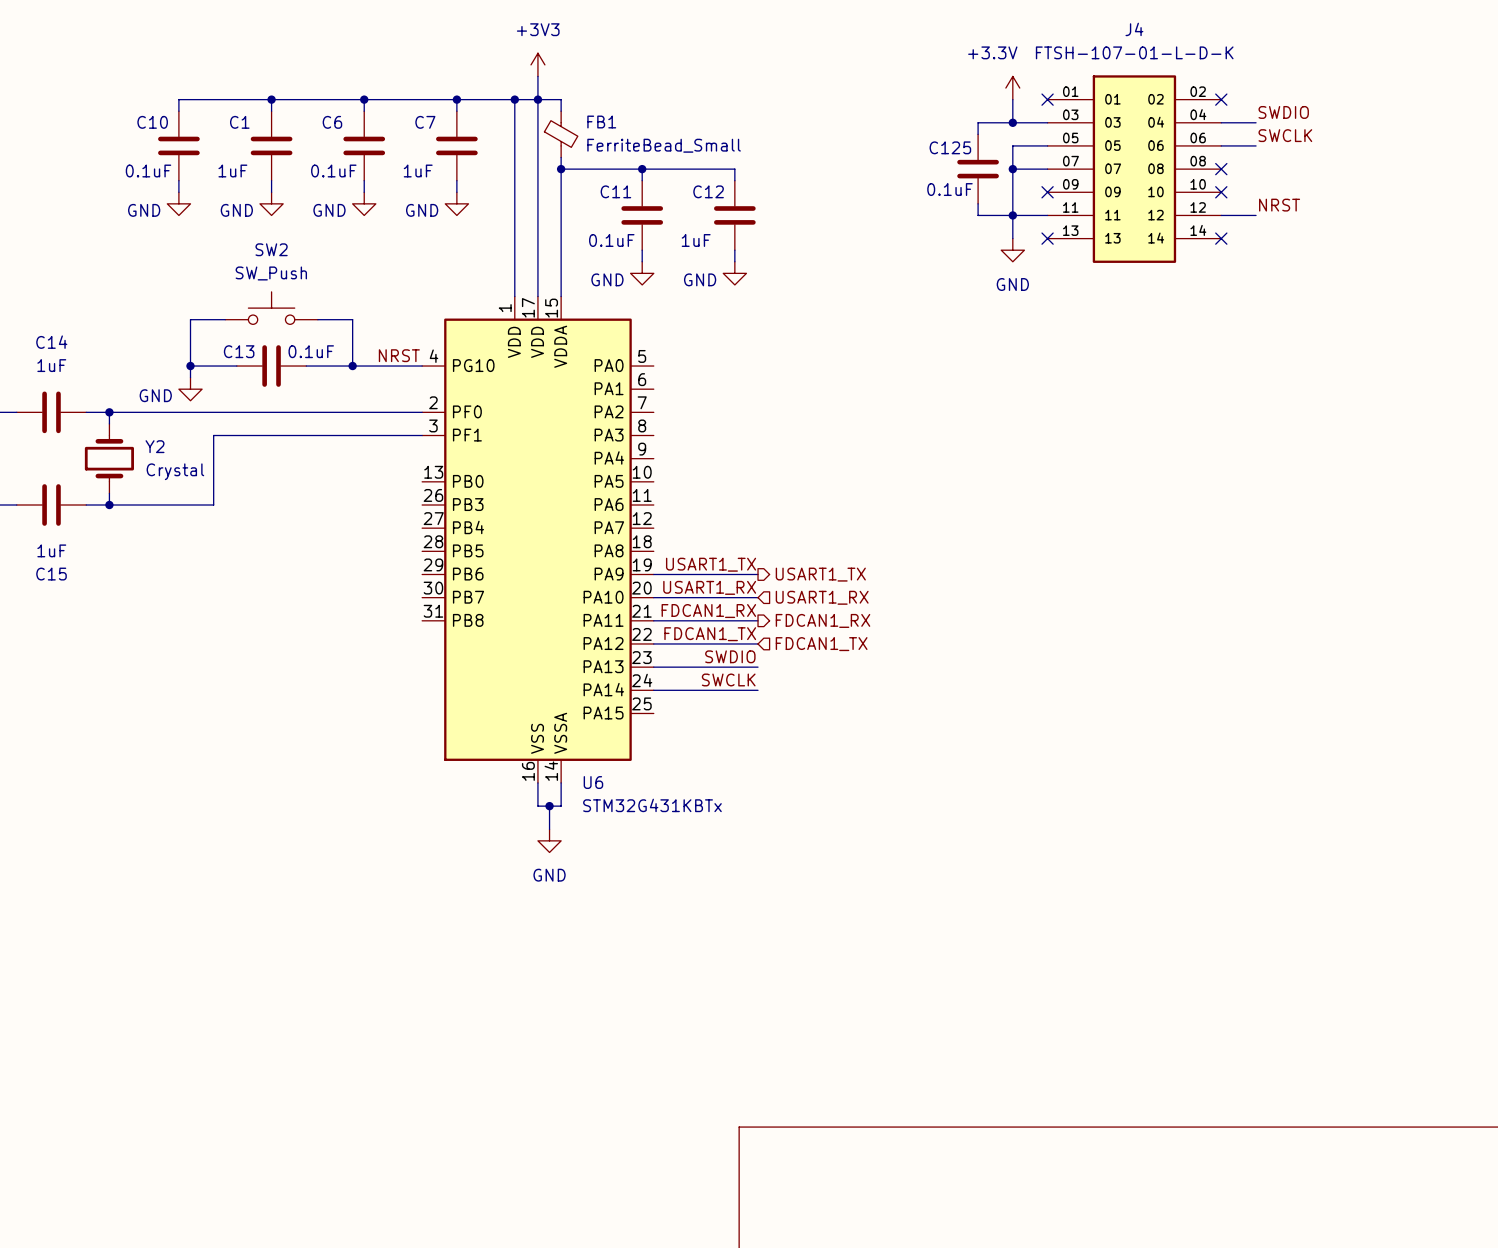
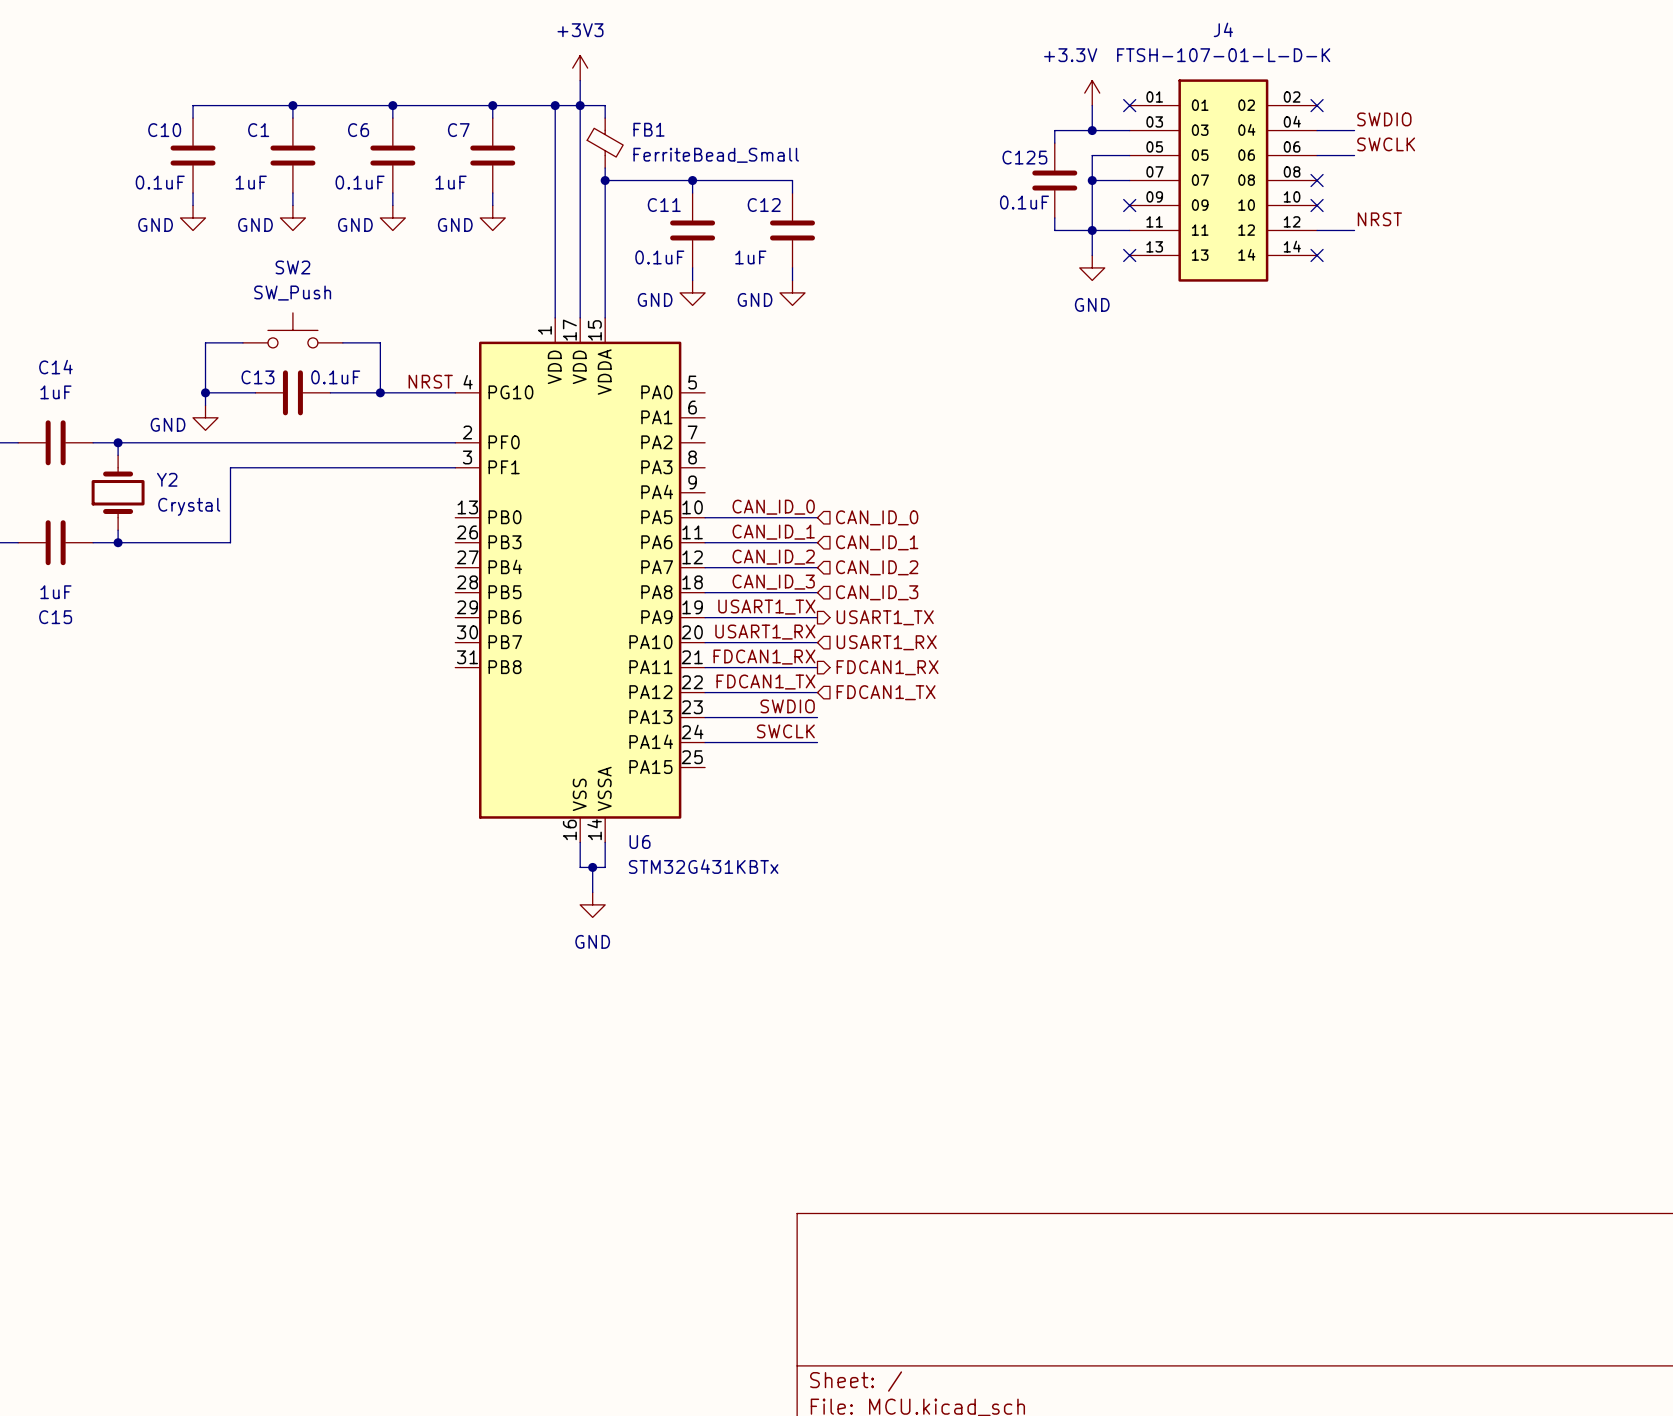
label: none -> CAN_ID_0 (773, 507)
wire: none -> (705, 517) (817, 517)
hierarchical label: none -> CAN_ID_0 (877, 517)
label: none -> CAN_ID_1 (773, 532)
wire: none -> (705, 542) (817, 542)
hierarchical label: none -> CAN_ID_1 (877, 542)
label: none -> CAN_ID_2 (773, 557)
wire: none -> (705, 567) (817, 567)
hierarchical label: none -> CAN_ID_2 (877, 567)
label: none -> CAN_ID_3 (773, 582)
wire: none -> (705, 592) (817, 592)
hierarchical label: none -> CAN_ID_3 (877, 592)

